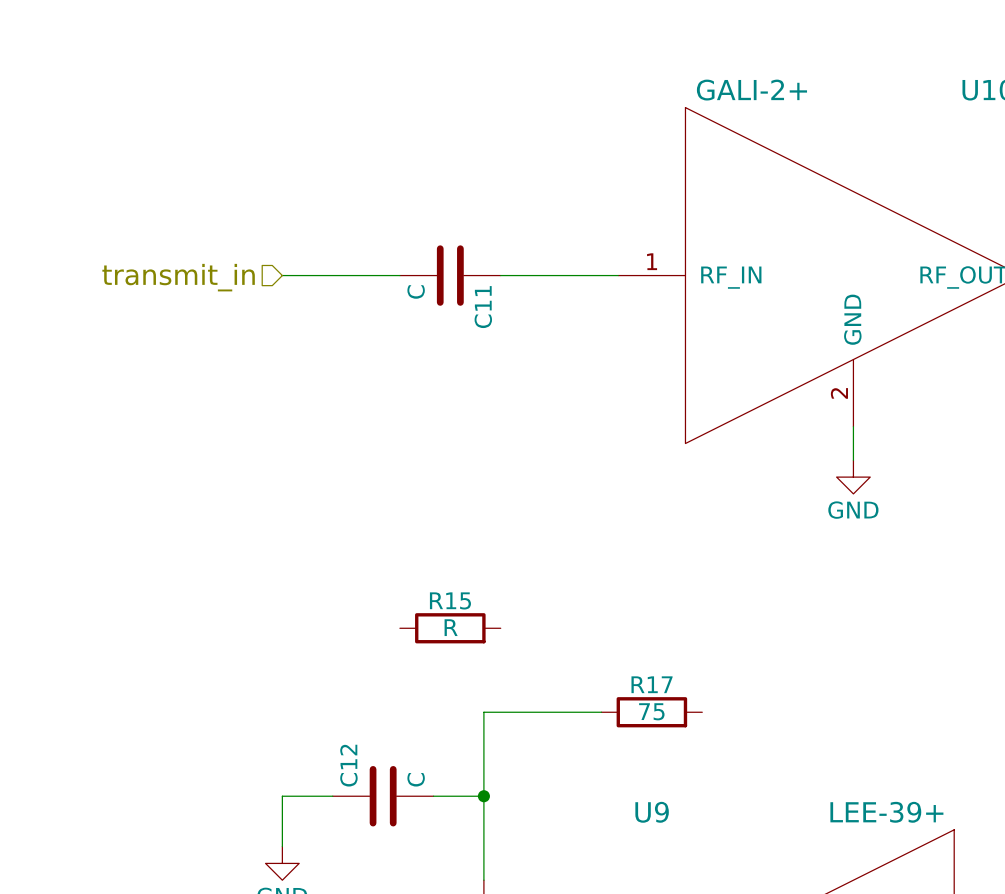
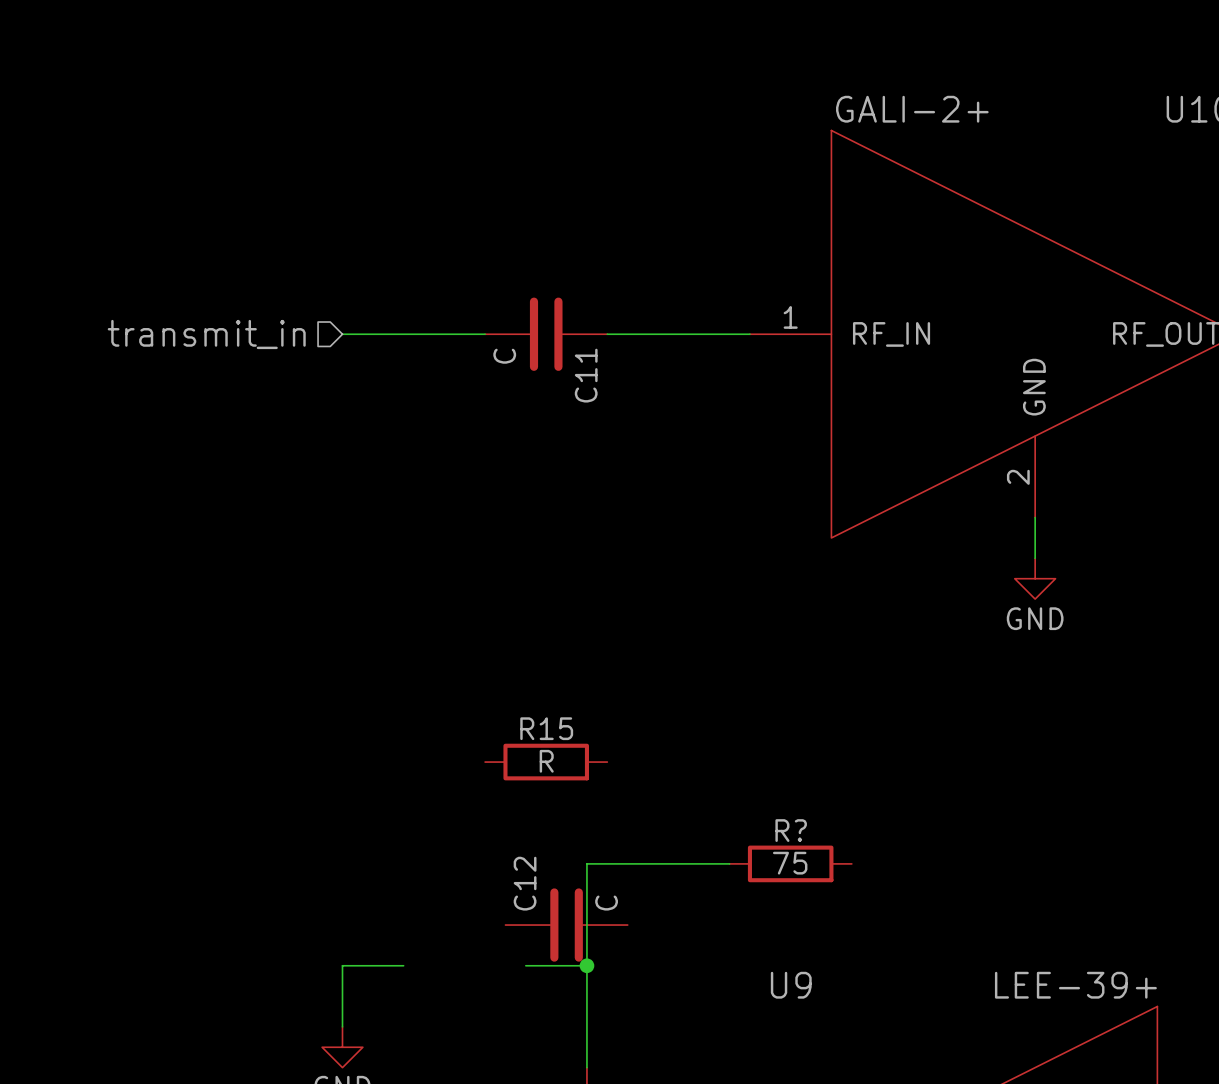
R17 name: R17 (652, 684) -> R? (791, 830)
C12 position: (383, 796) -> (566, 925)

